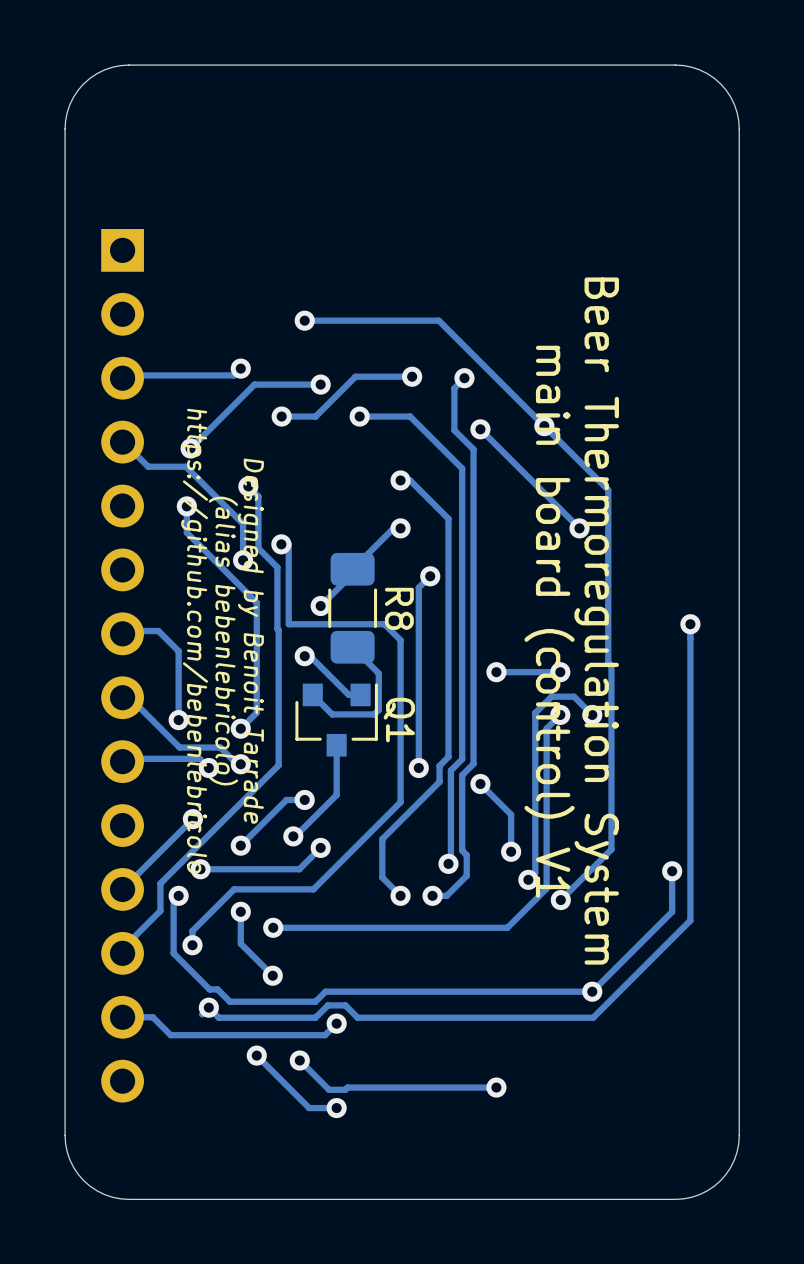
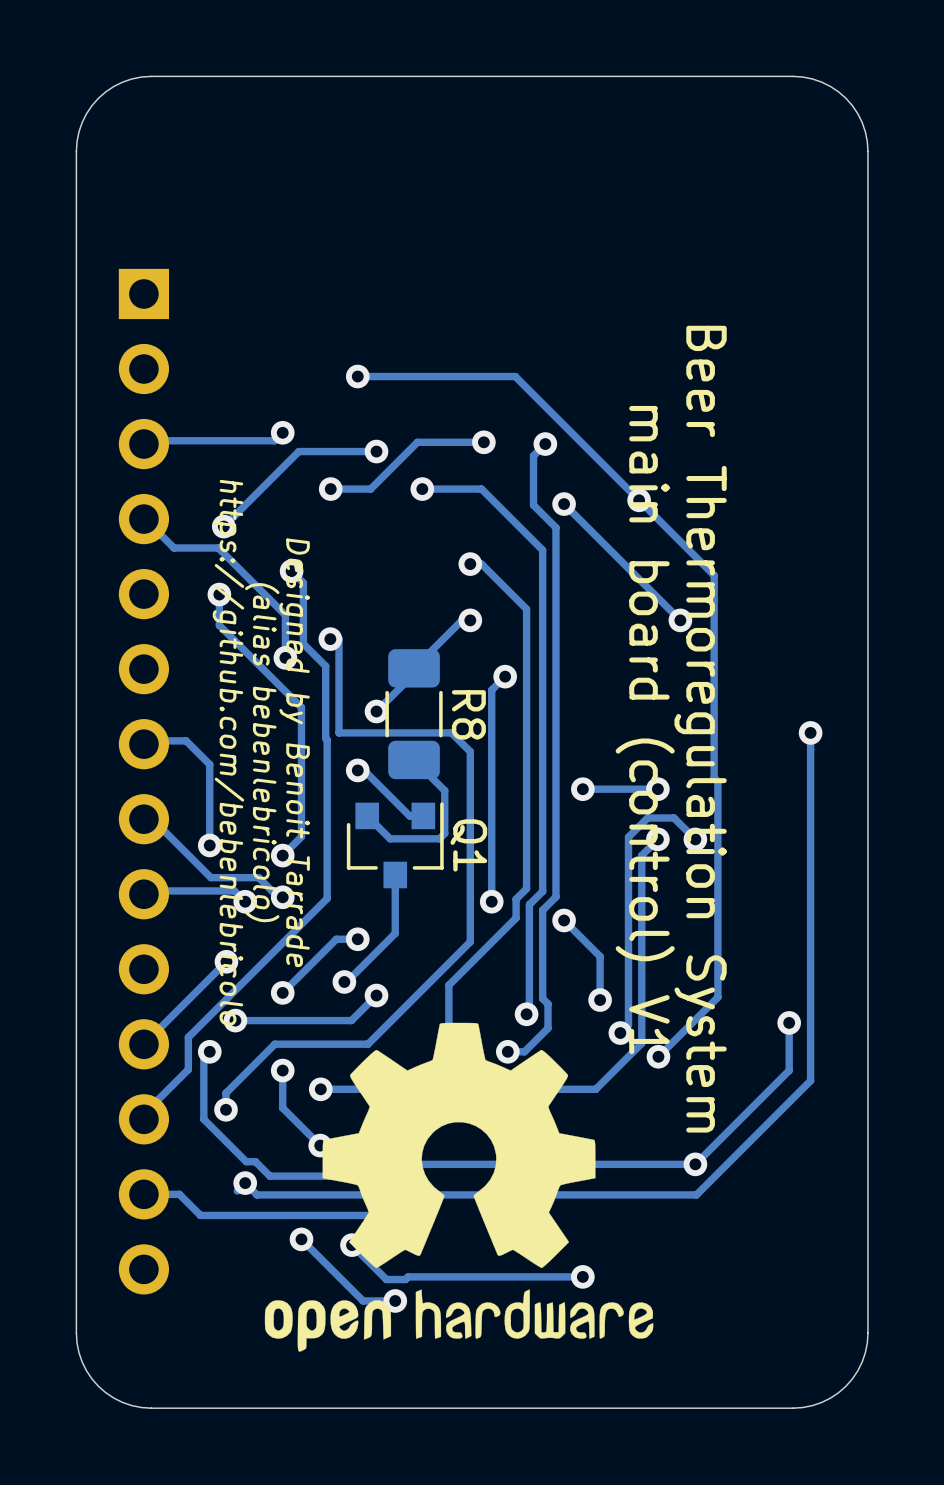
drawing: none -> [264, 1022, 654, 1352]

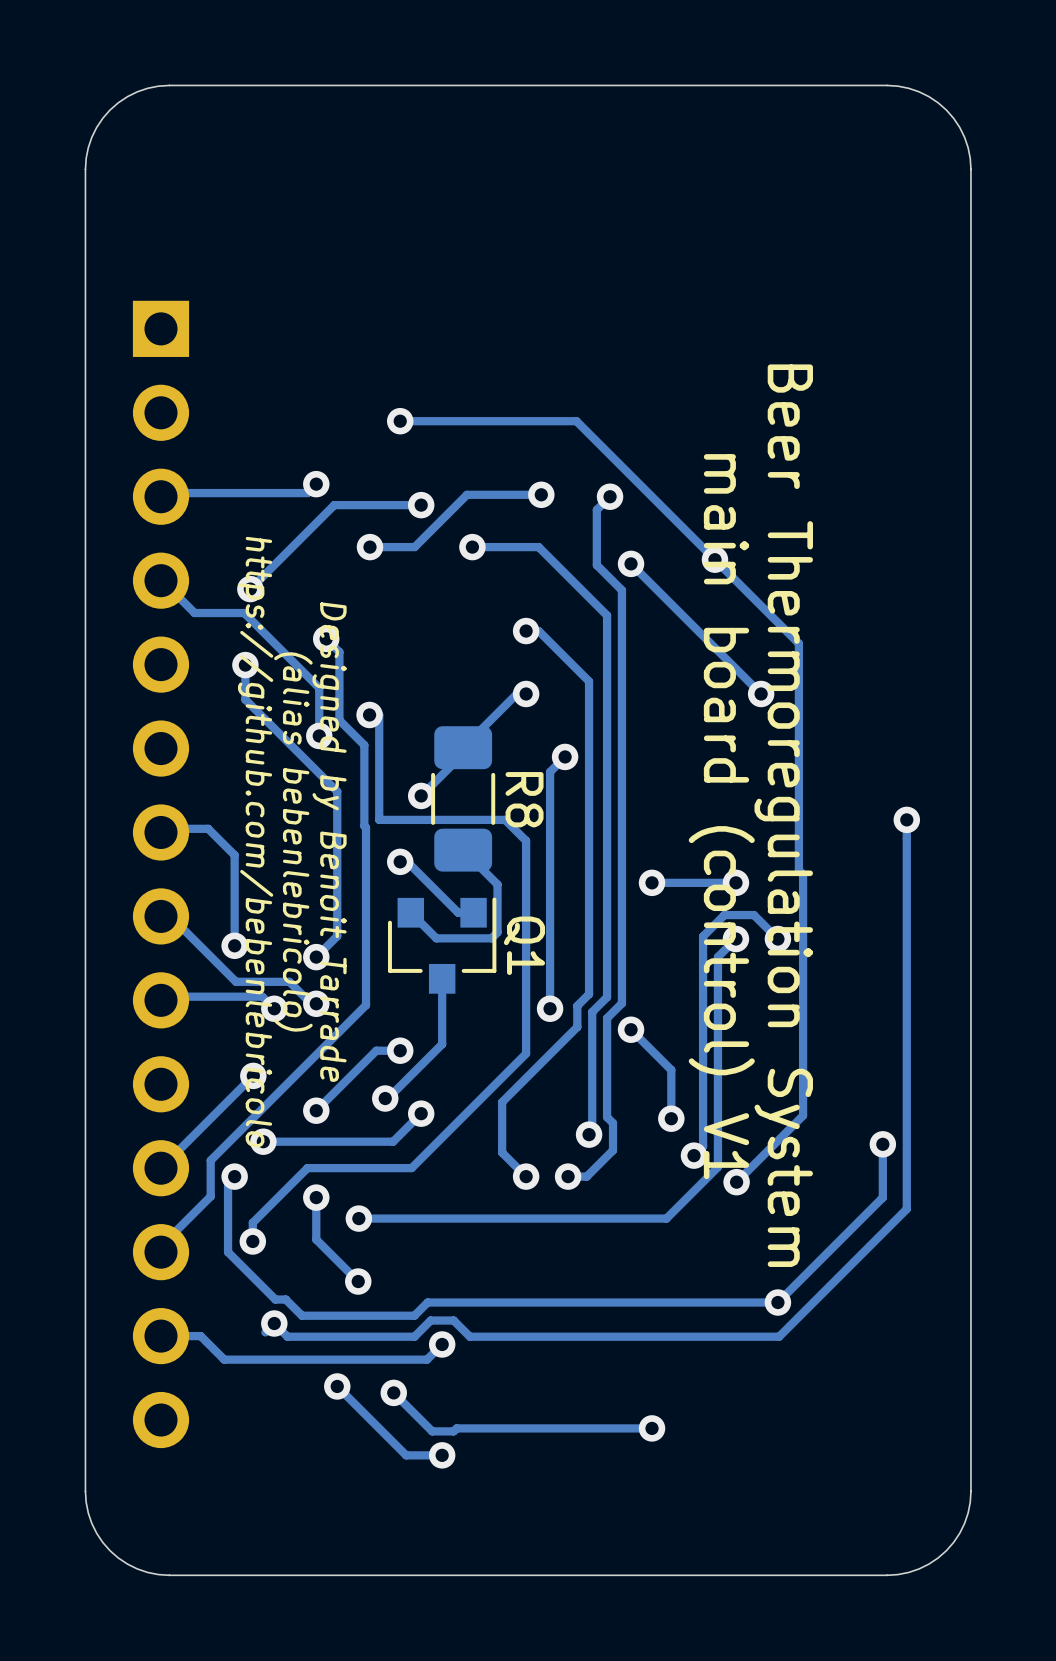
drawing: [264, 1022, 654, 1352] -> none

